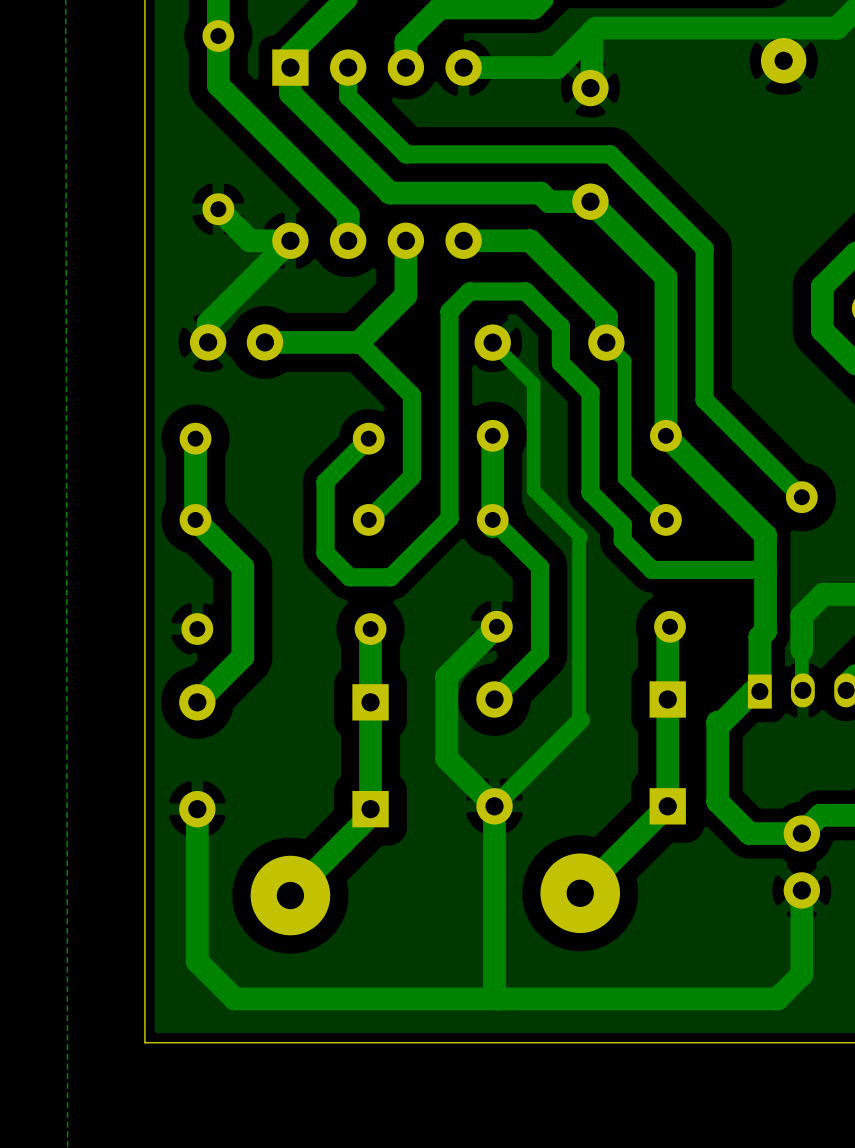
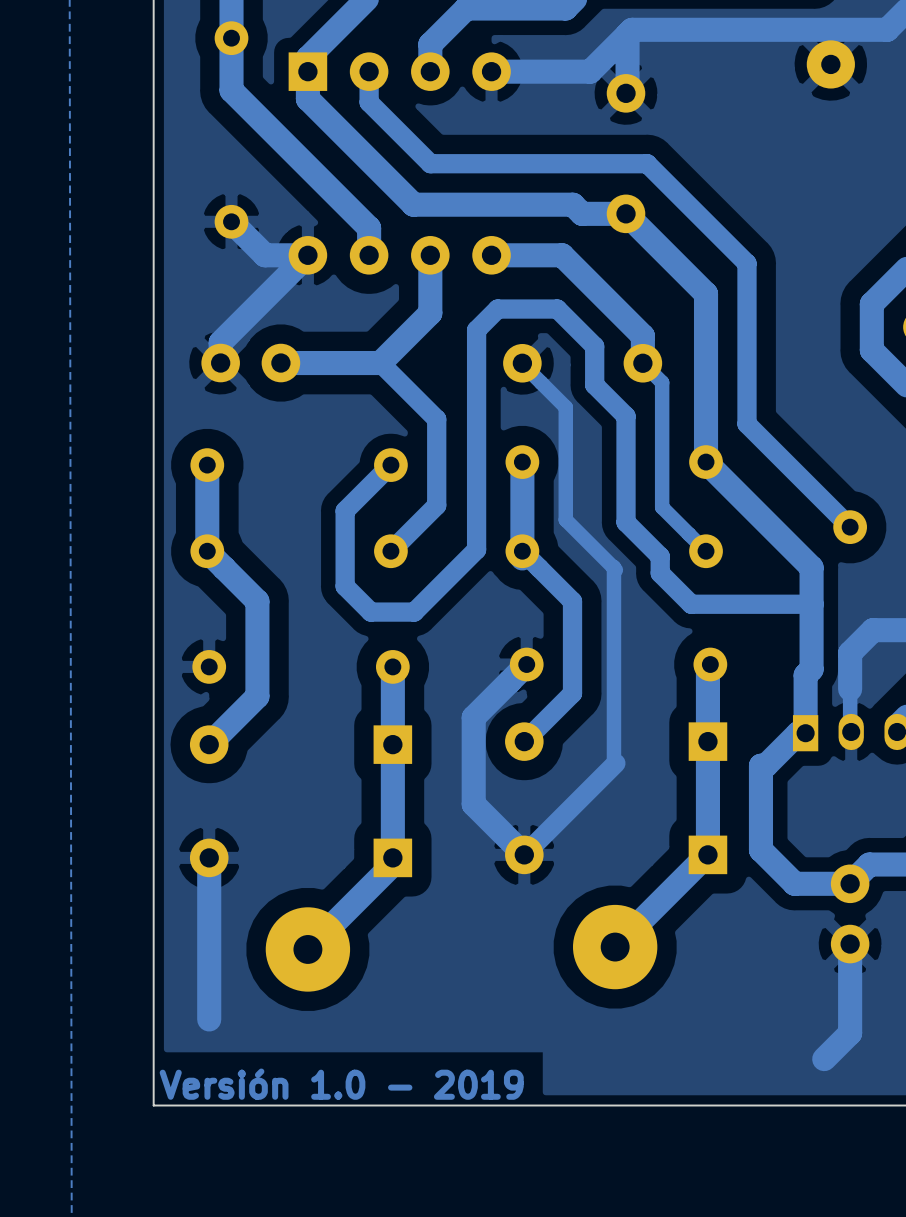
track: (494, 806) (494, 995) (497, 998) -> none
track: (197, 961) (234, 998) (777, 998) -> none
text: none -> Versión 1.0 - 2019 (341, 1084)

